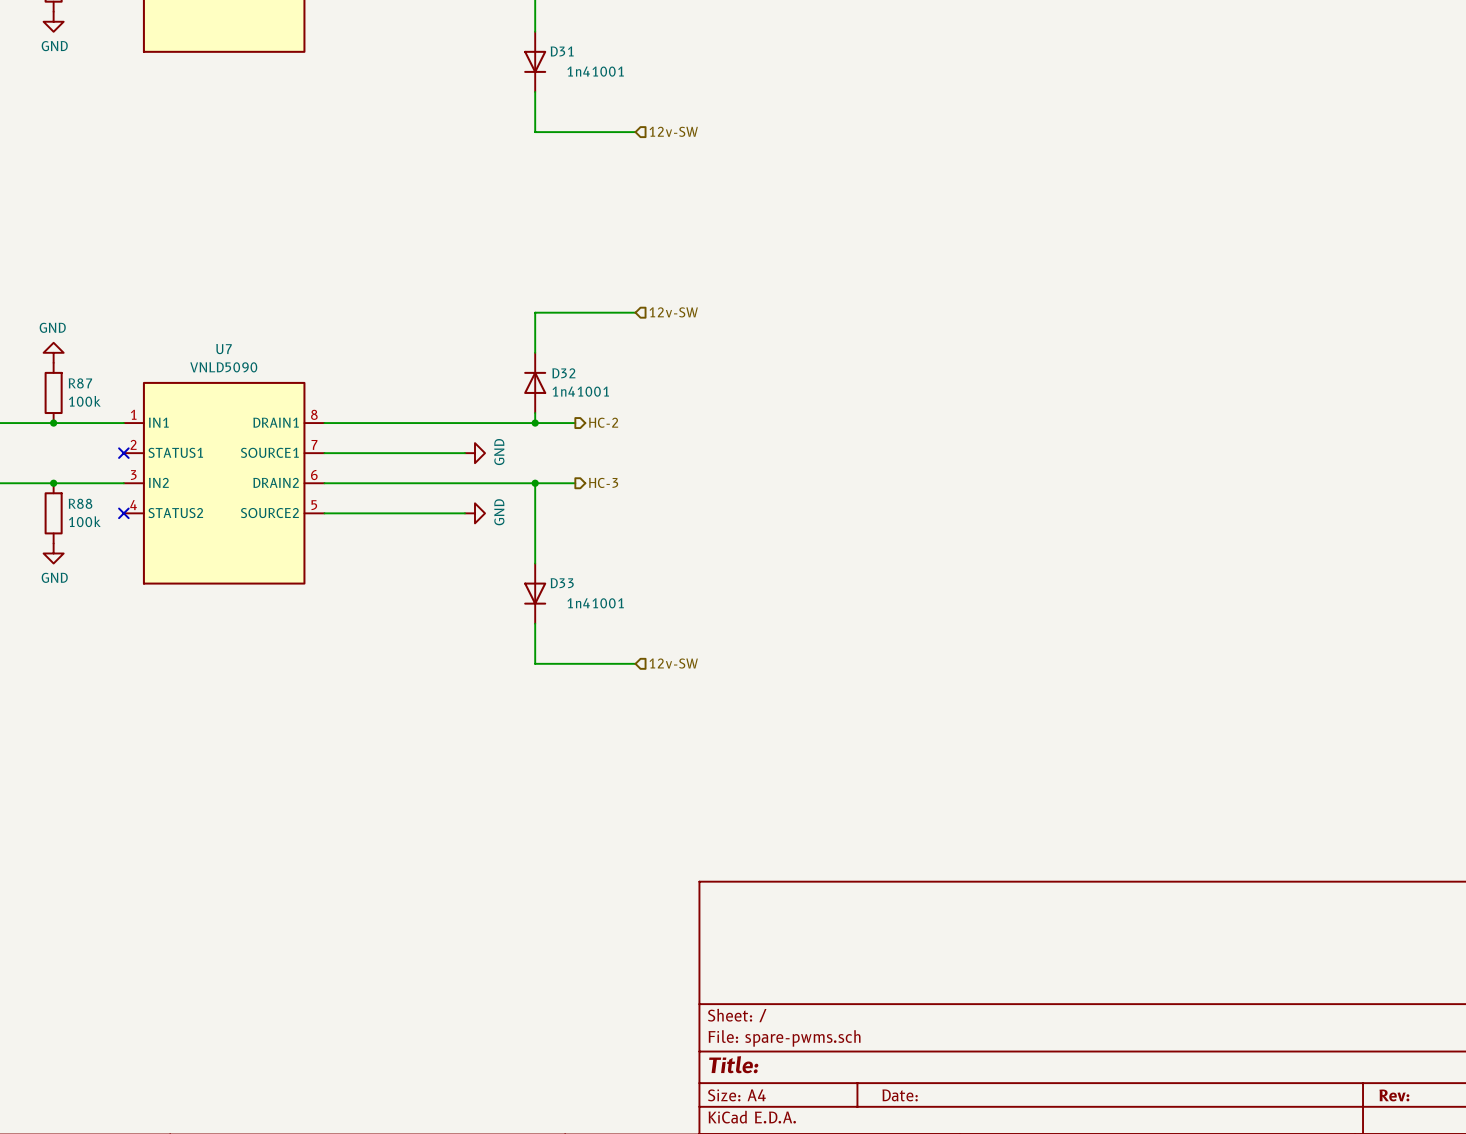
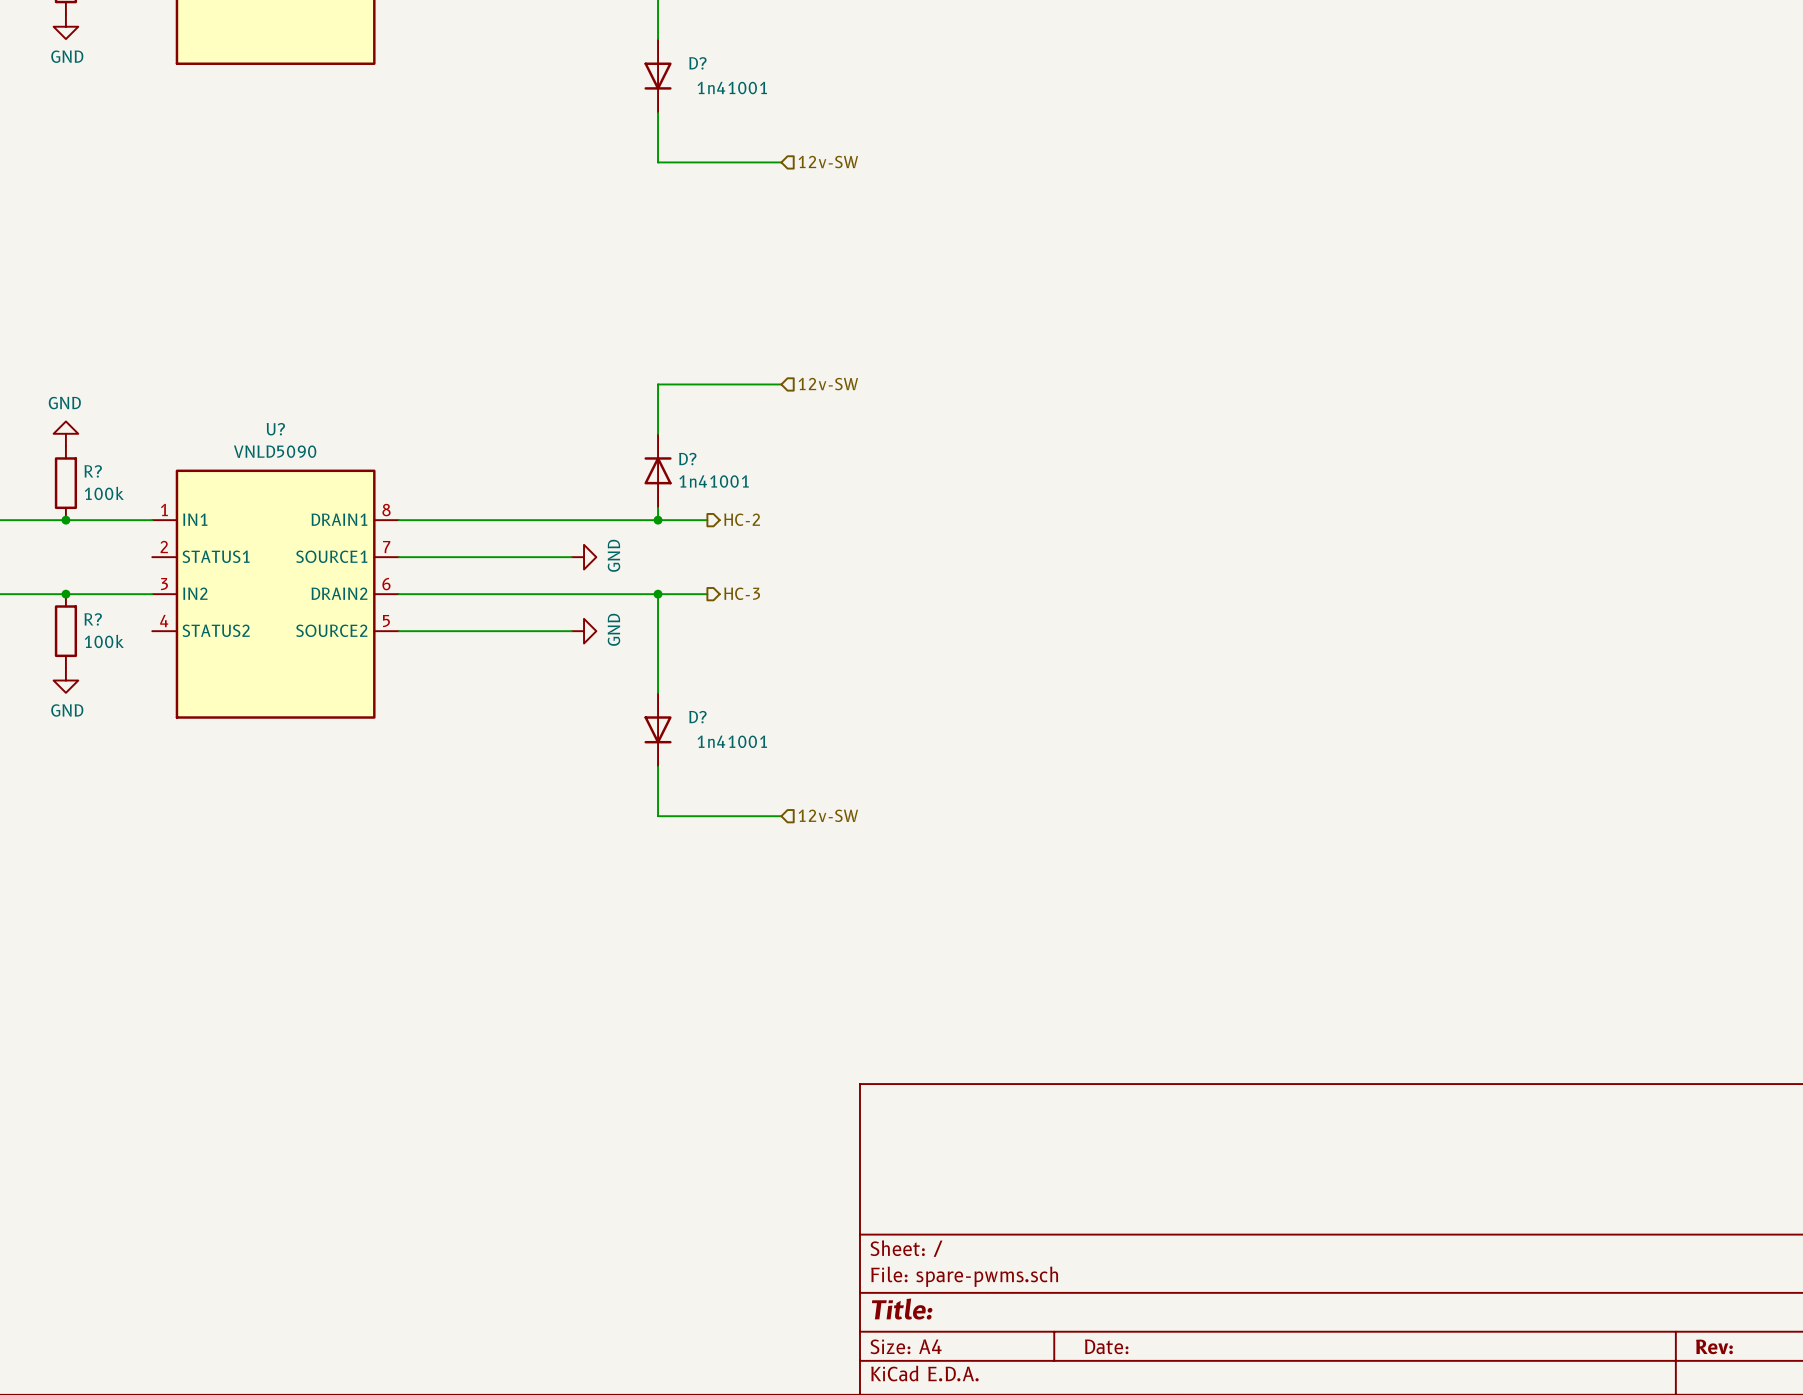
D31 name: D31 (562, 51) -> D? (697, 63)
U7 name: U7 (224, 349) -> U? (275, 429)
D32 name: D32 (563, 373) -> D? (687, 459)
R87 name: R87 (80, 383) -> R? (93, 471)
no-connect mark: (123, 453) -> none
R88 name: R88 (80, 503) -> R? (93, 619)
no-connect mark: (123, 513) -> none
D33 name: D33 (562, 583) -> D? (697, 717)

